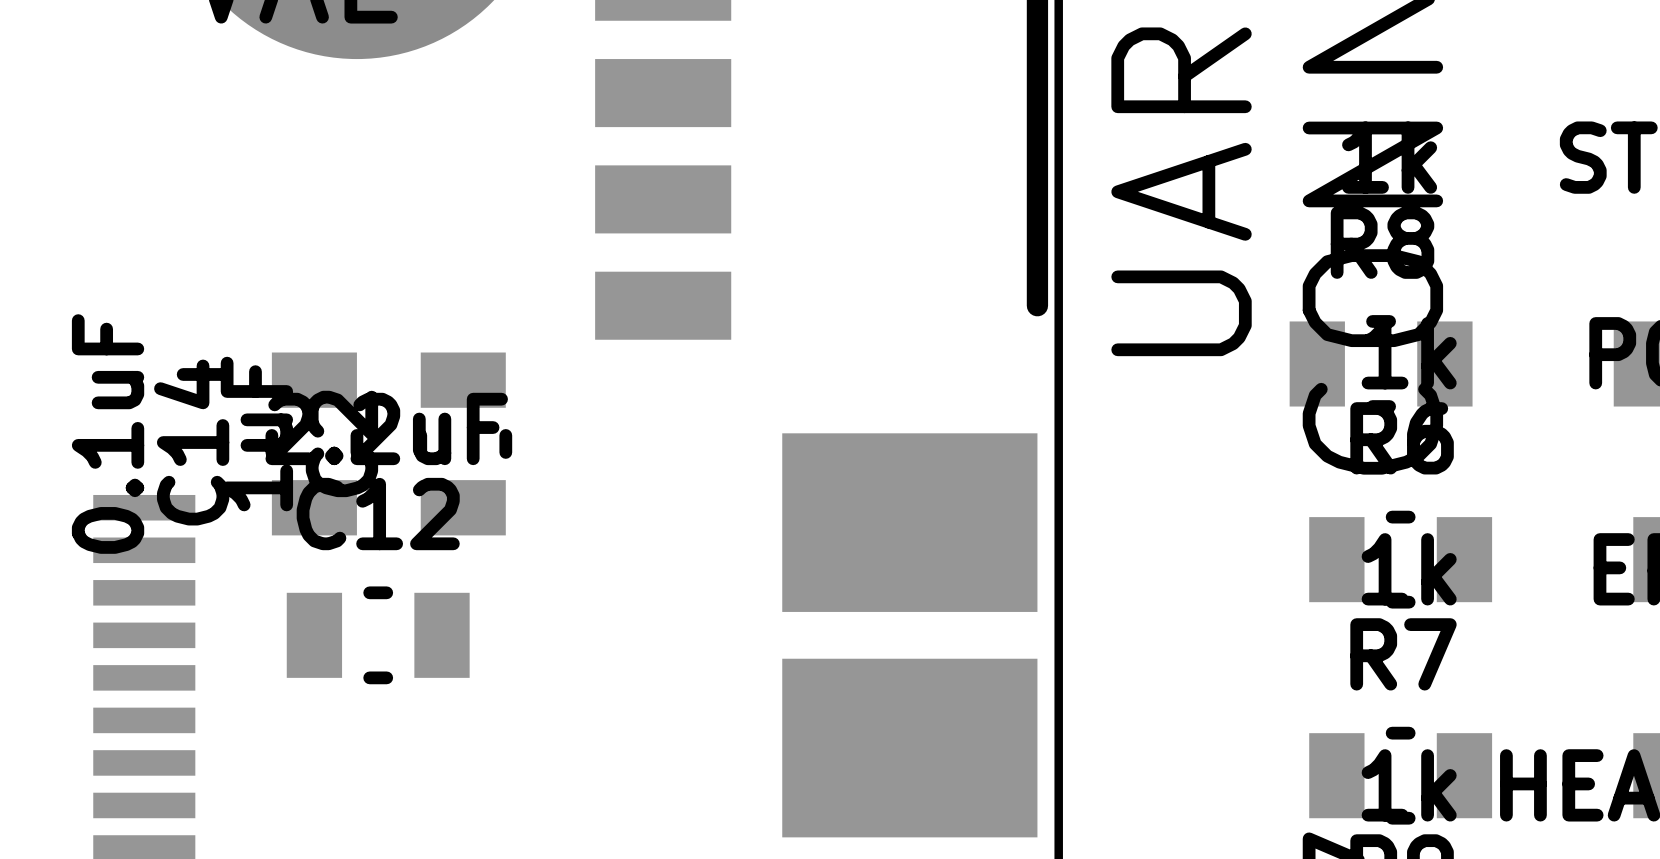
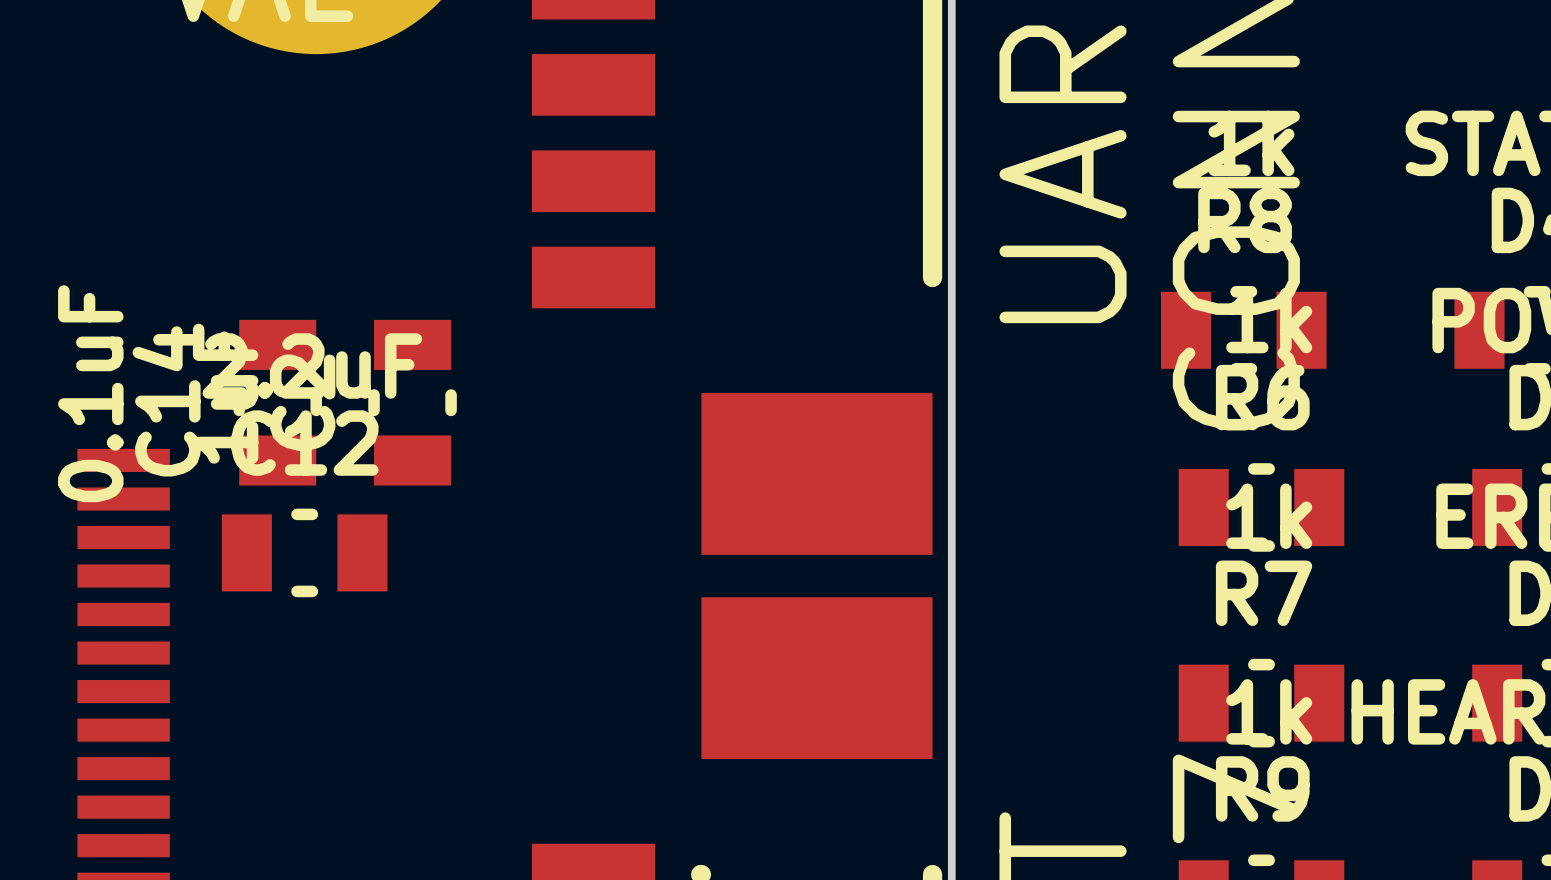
C12 position: (378, 635) -> (304, 552)

